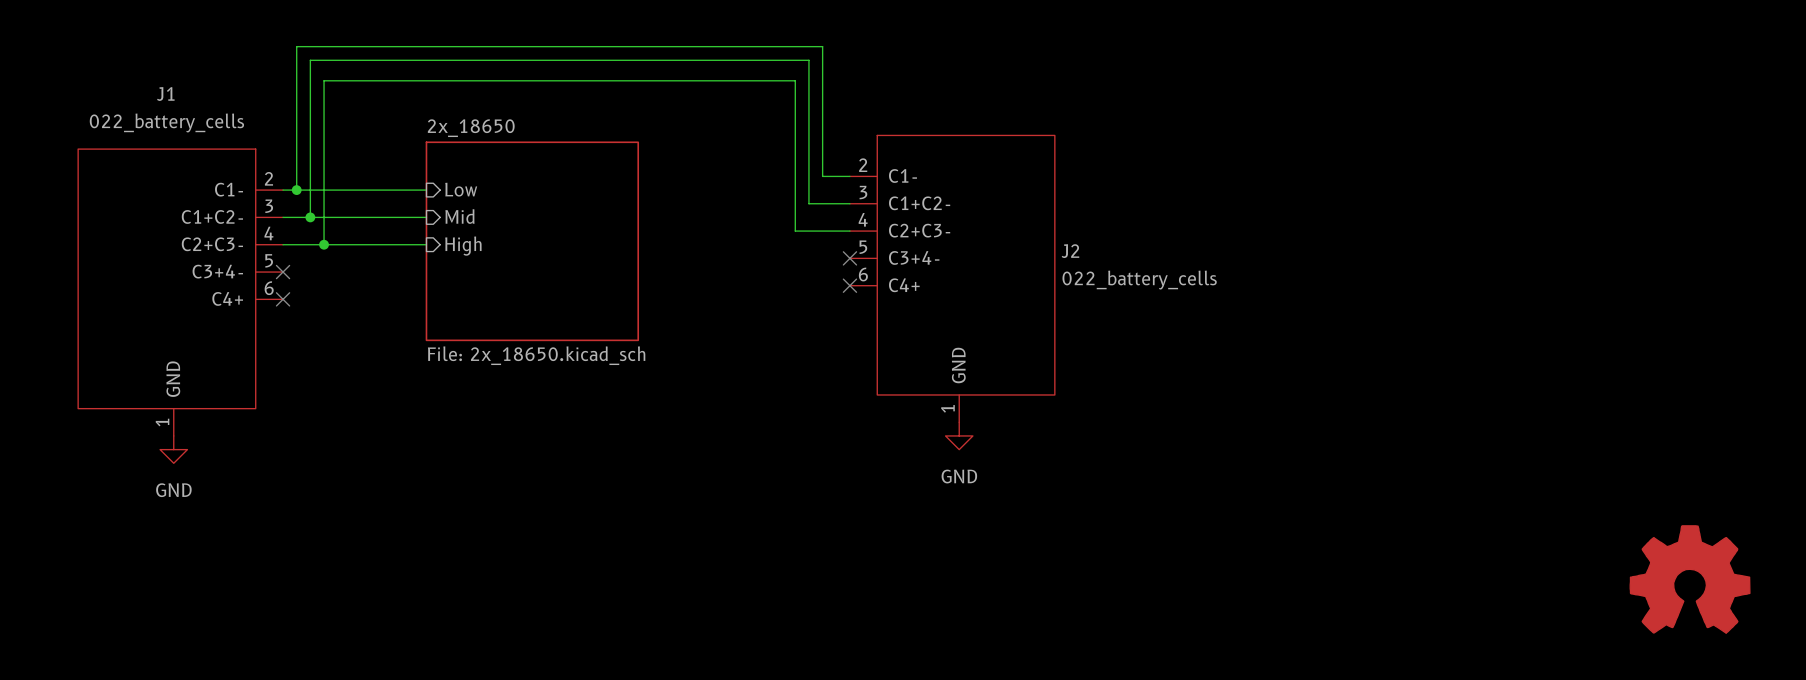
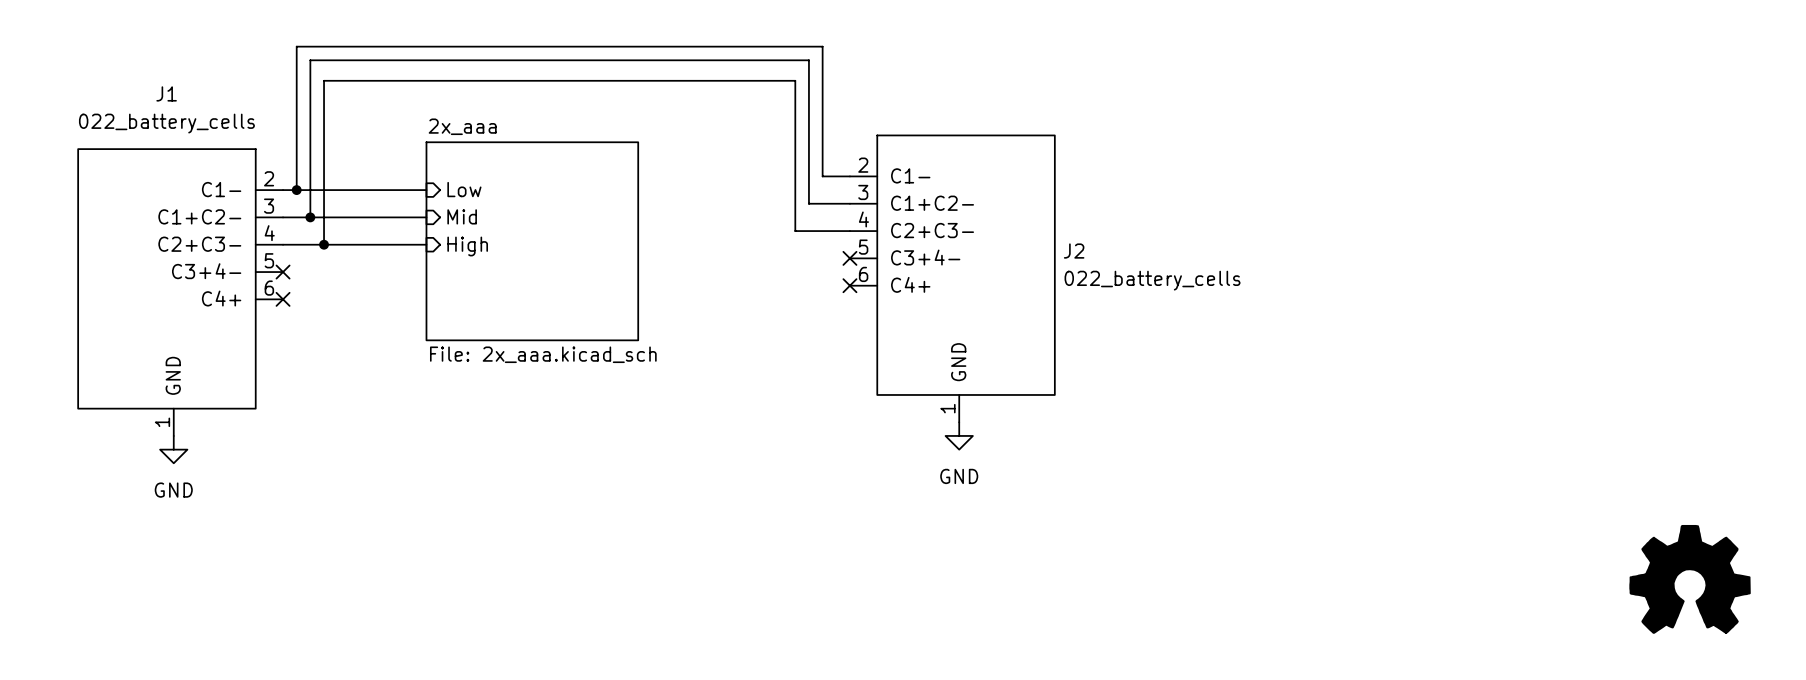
sheet 2x_18650 name: 2x_18650 (471, 128) -> 2x_aaa (462, 126)
sheet 2x_18650 value: File: 2x_18650.kicad_sch (536, 355) -> File: 2x_aaa.kicad_sch (543, 354)

